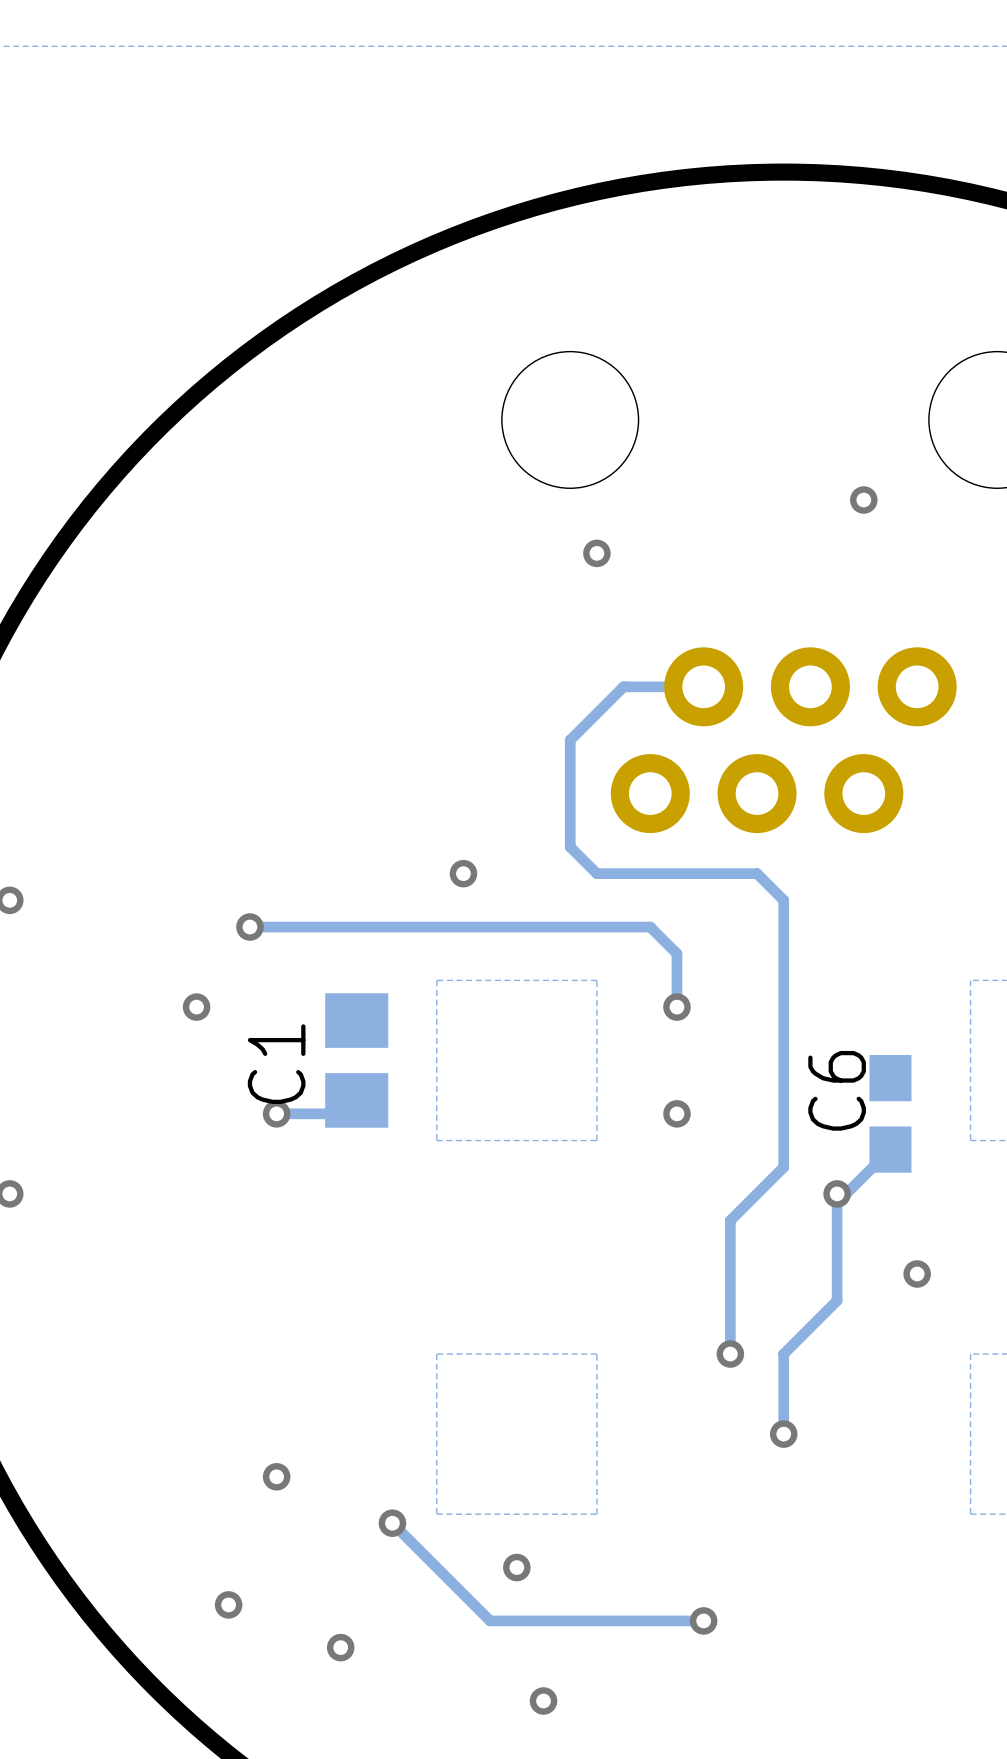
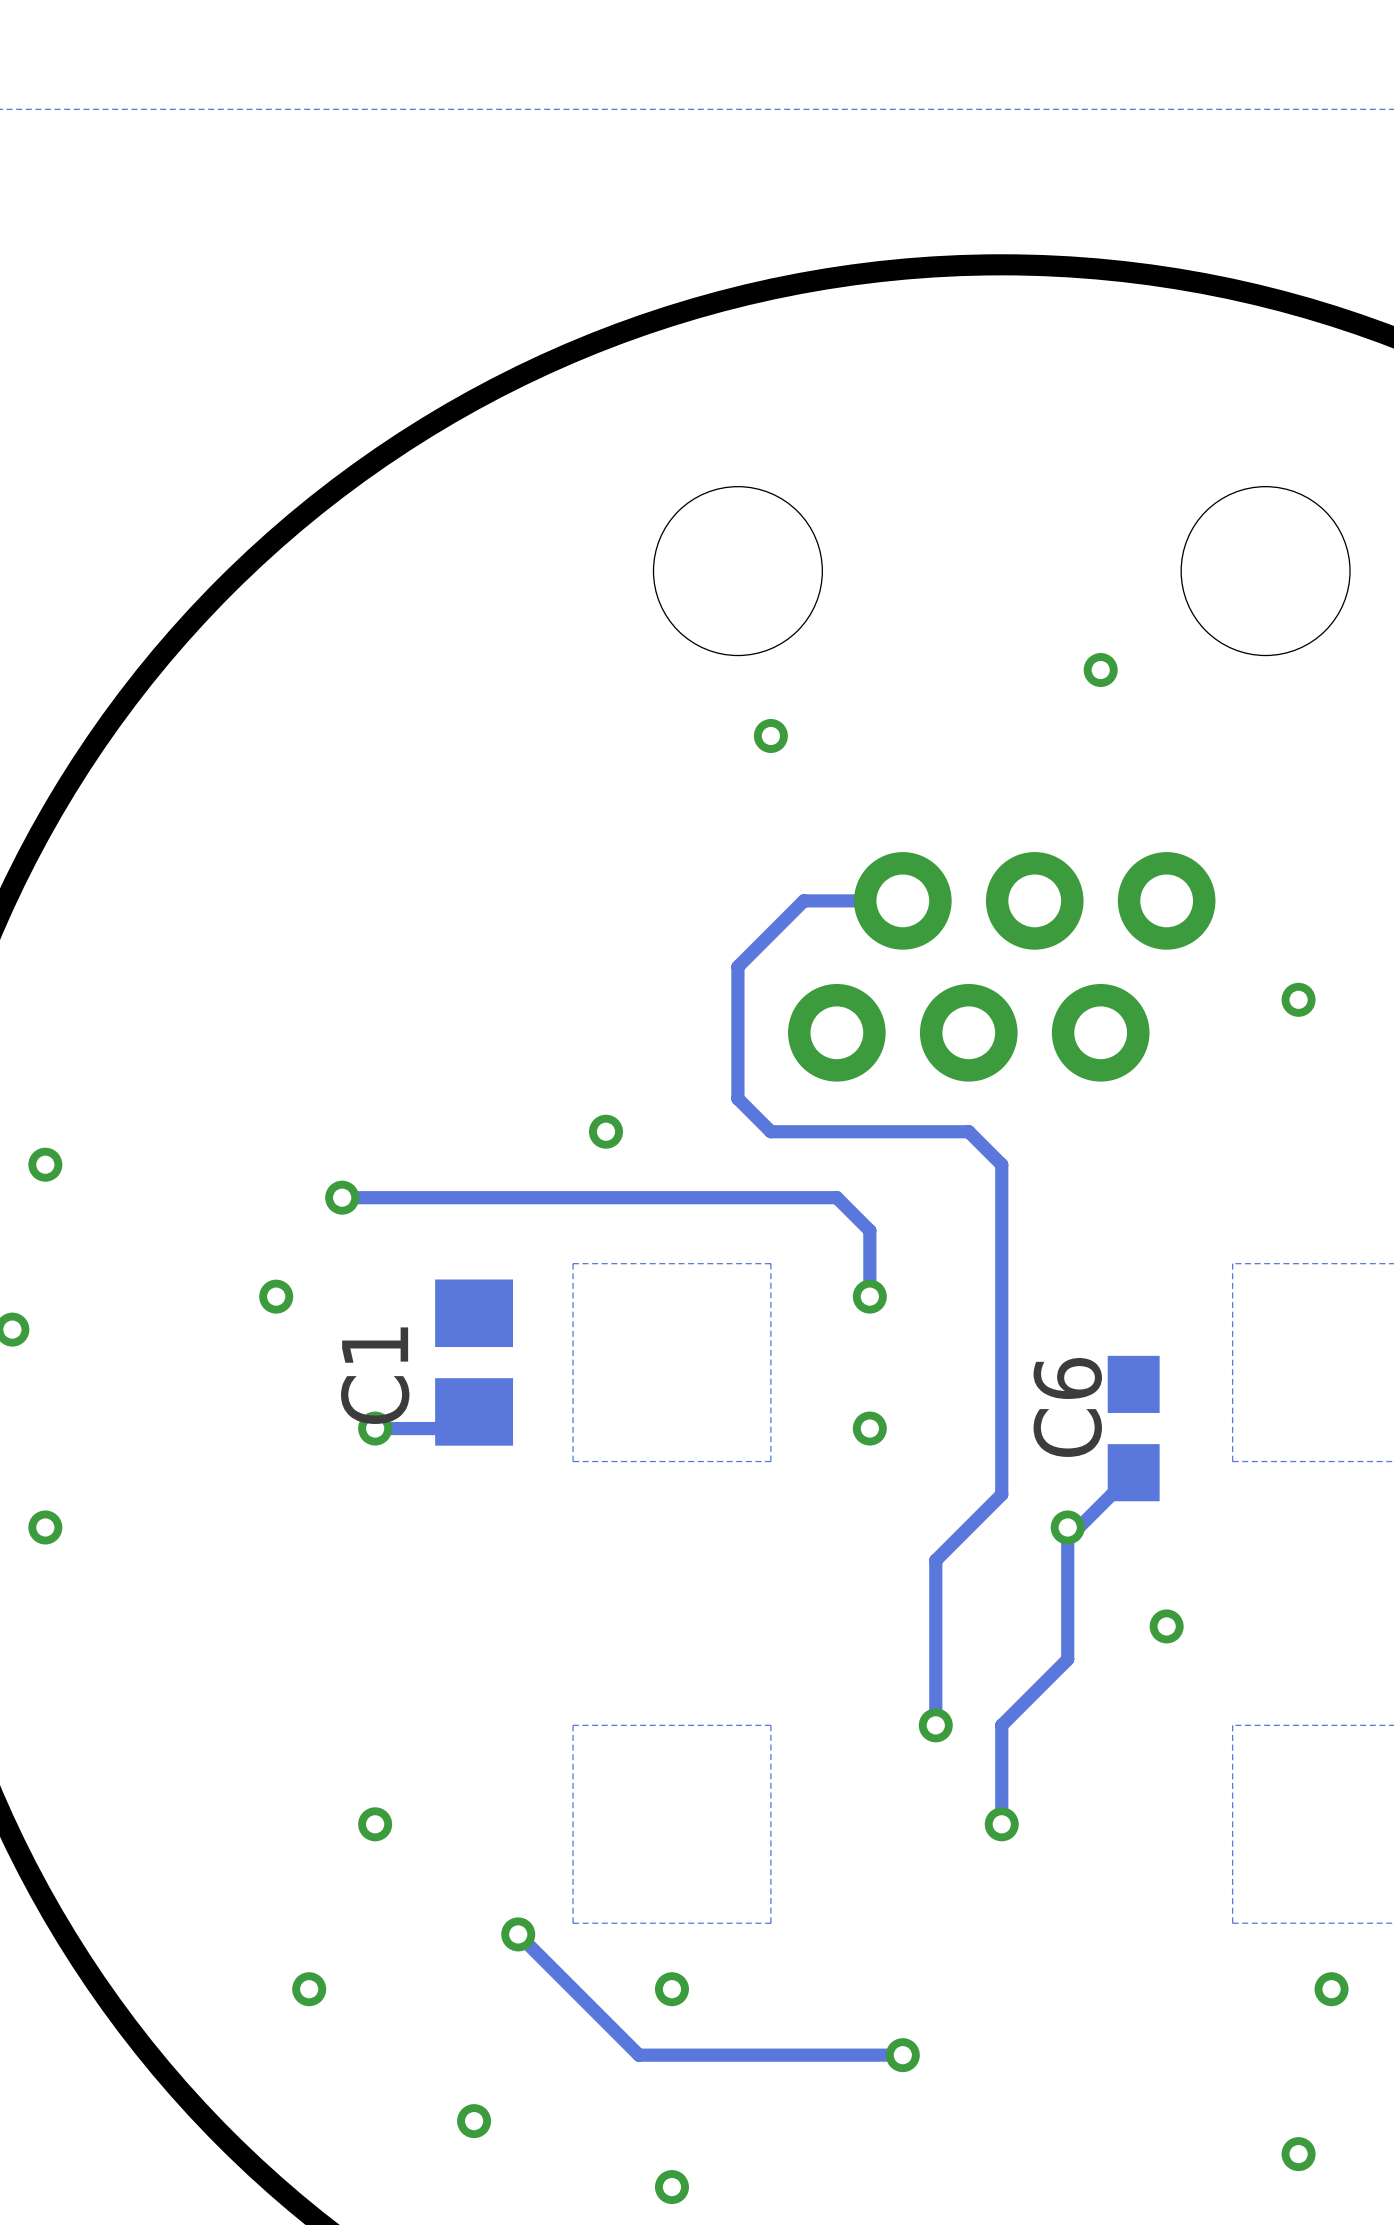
via position: (276, 1476) -> (375, 1824)
via position: (228, 1604) -> (309, 1989)
via position: (340, 1647) -> (474, 2121)
via position: (543, 1700) -> (671, 2187)

